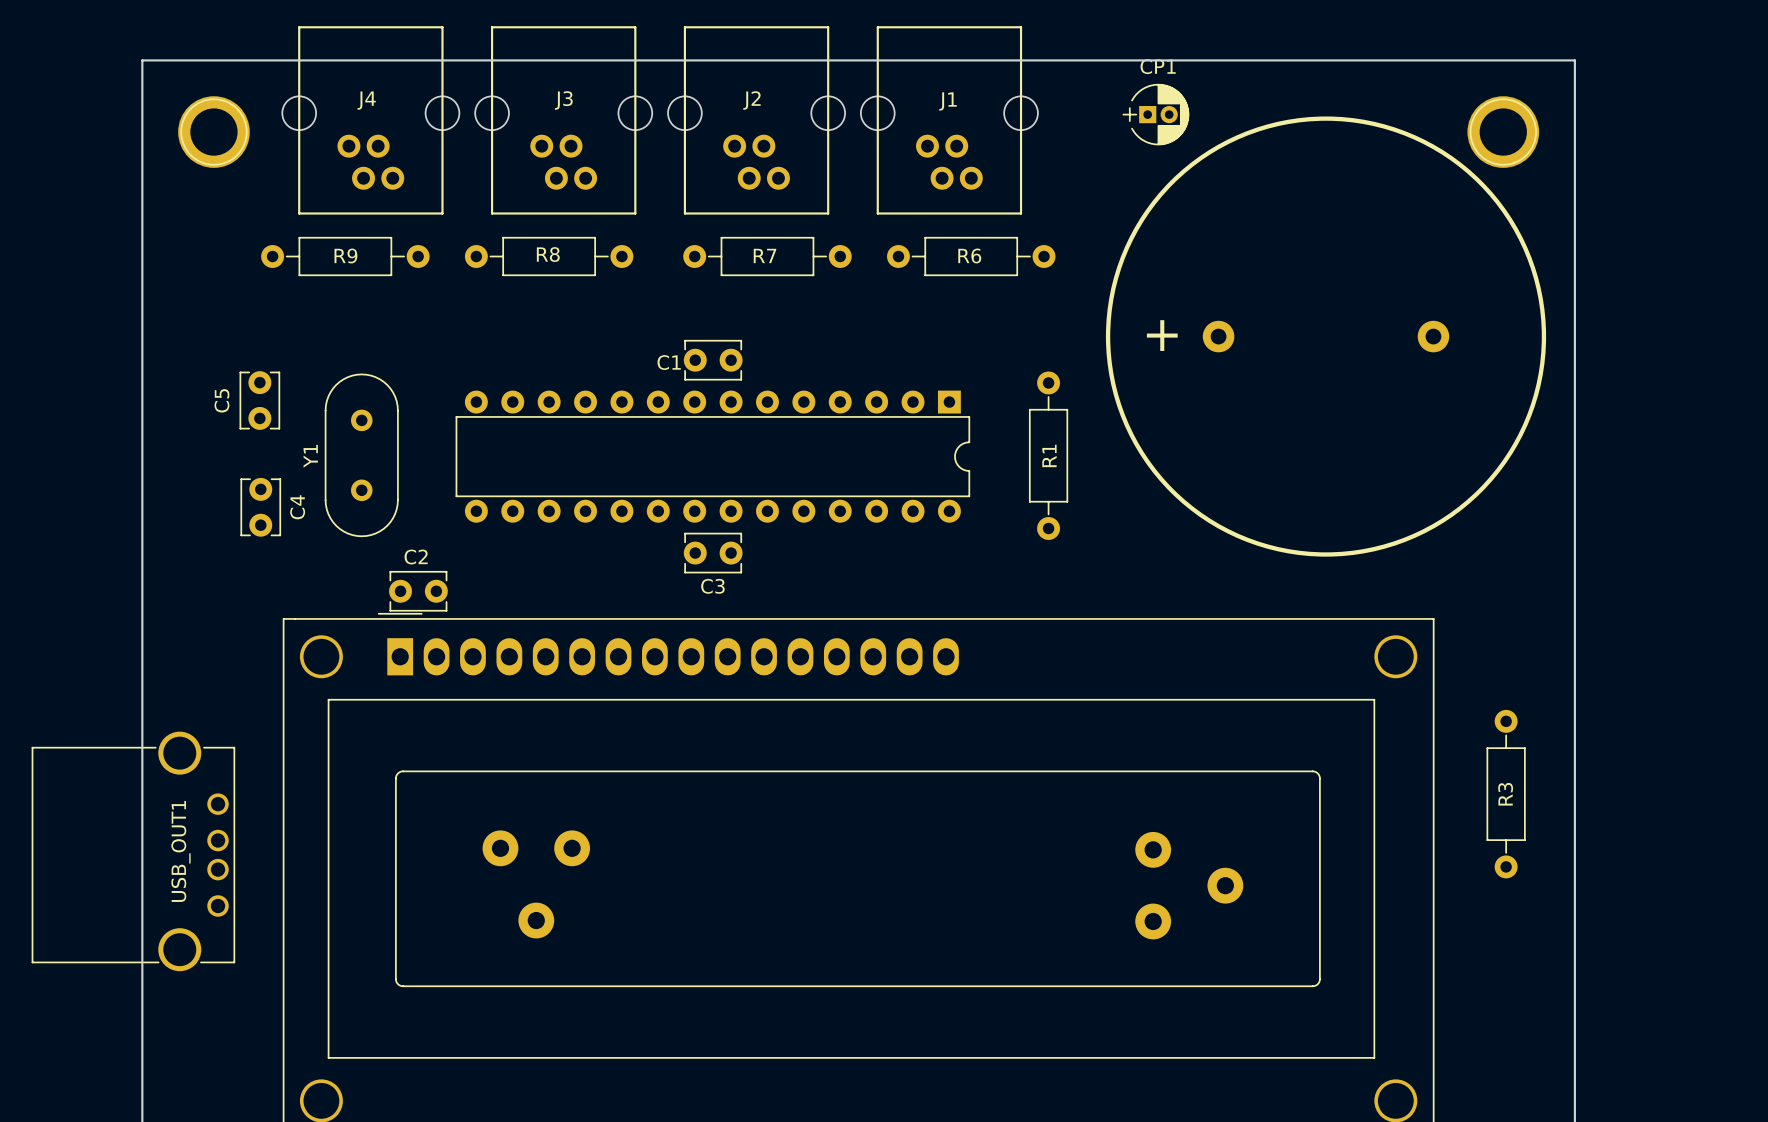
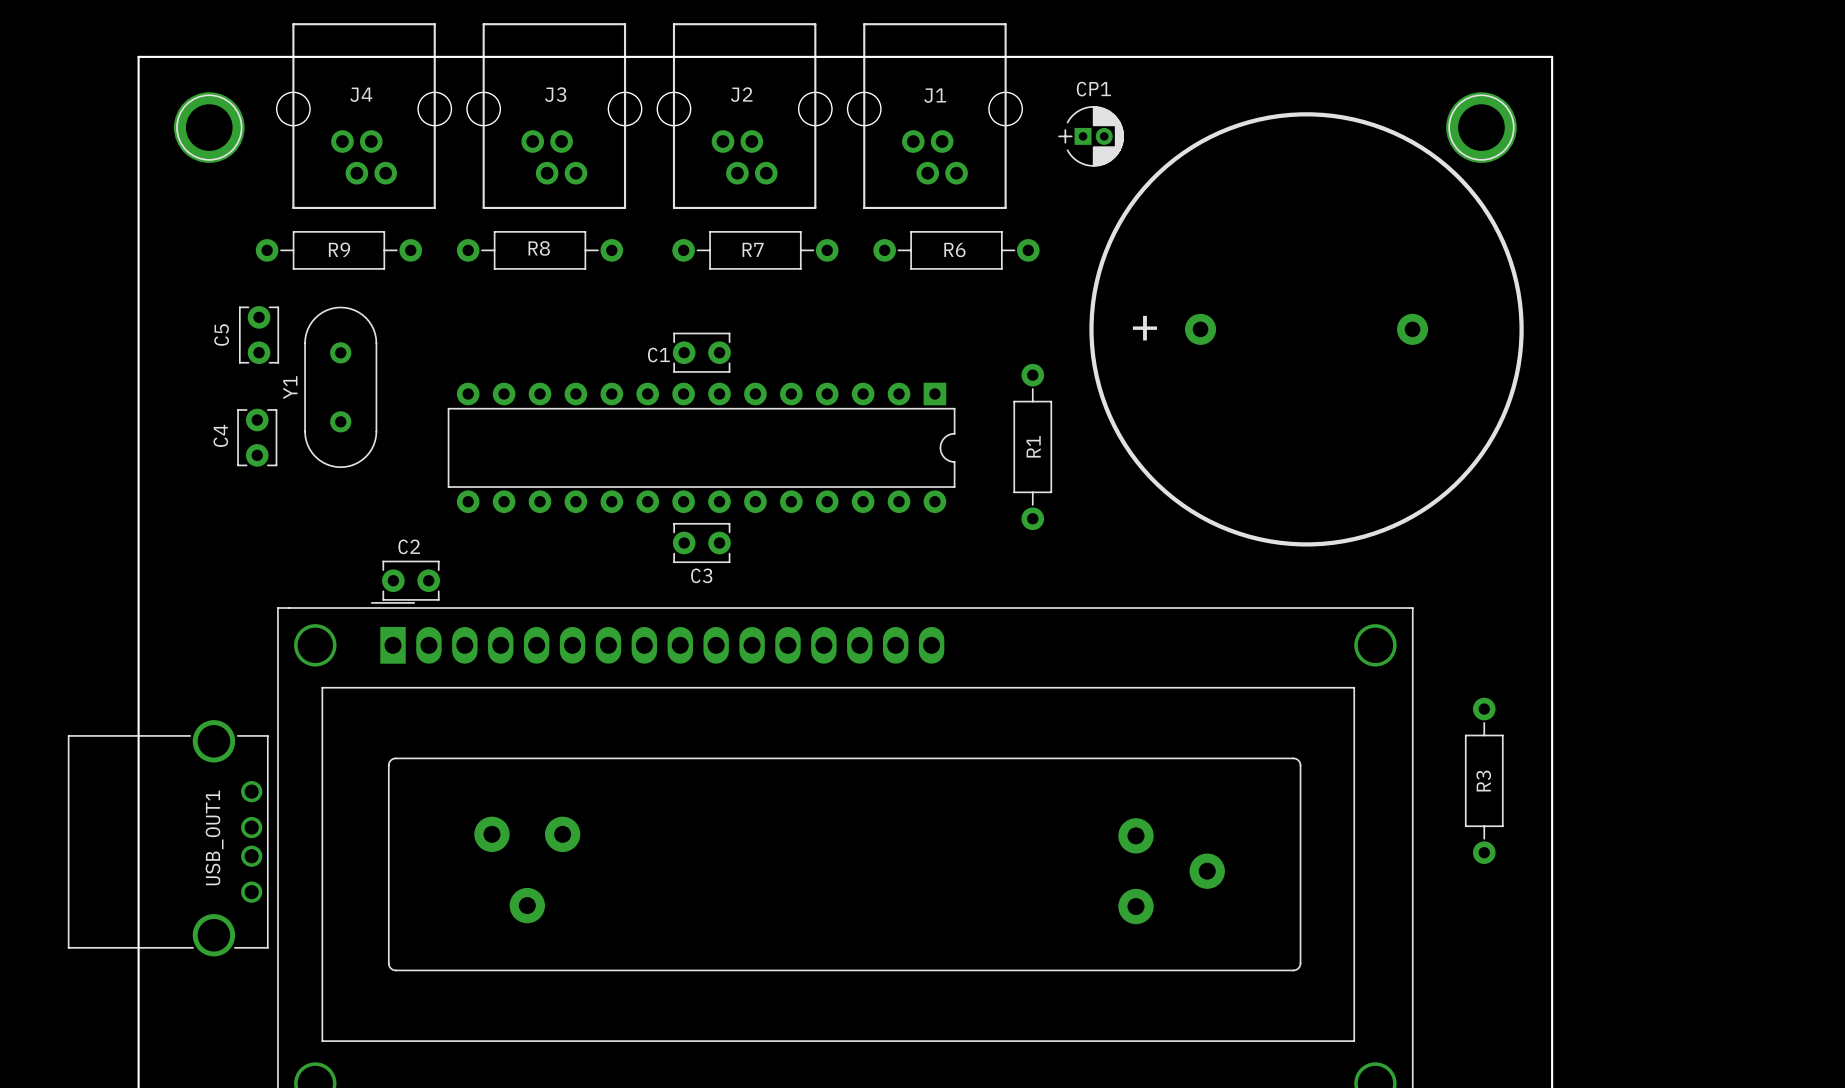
CP1 position: (1155, 114) -> (1091, 136)
C5 position: (259, 400) -> (259, 335)
Y1 position: (361, 455) -> (340, 387)
C4 position: (260, 507) -> (257, 437)
C4 name position: C4 (297, 507) -> C4 (220, 435)
USB_OUT1 position: (133, 851) -> (168, 838)

